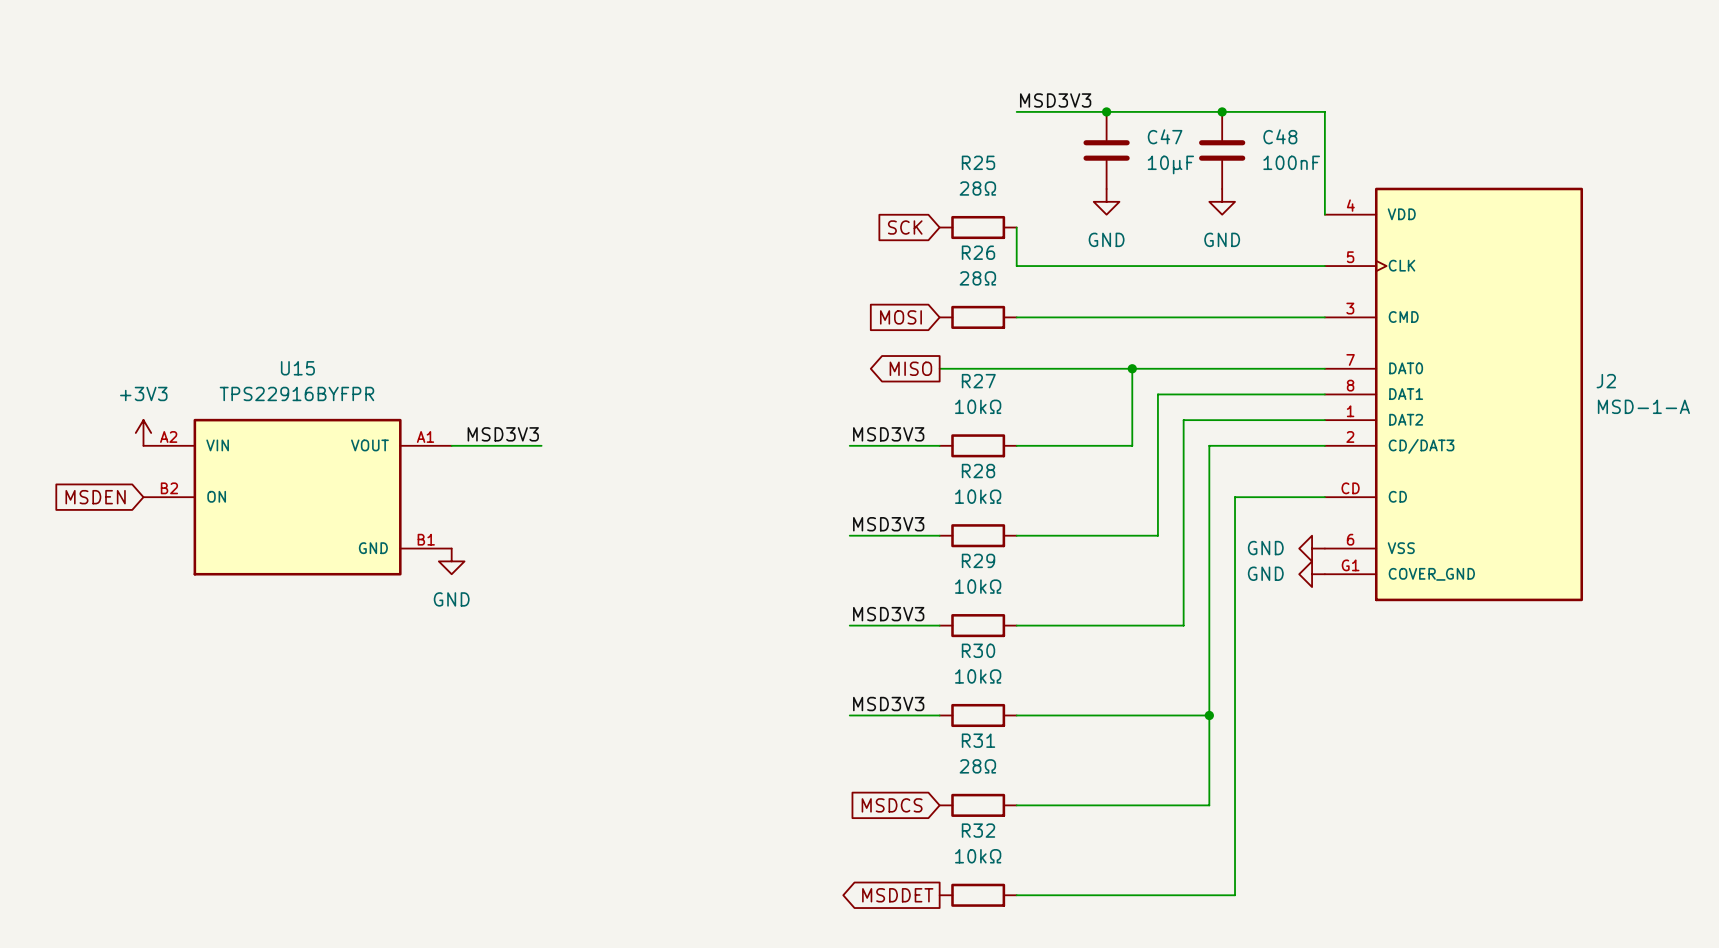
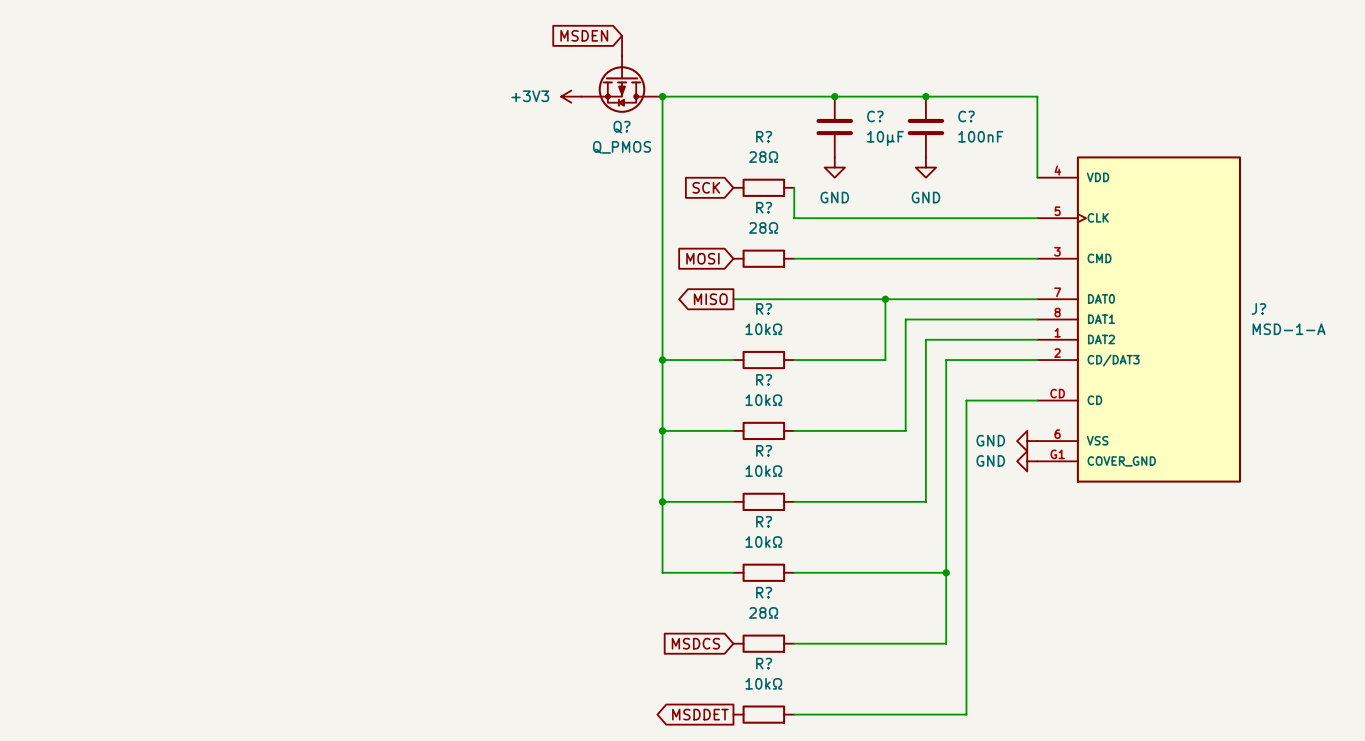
global label: none -> MSDEN (584, 35)
Q?: none -> Q_PMOS (622, 74)
label: MSD3V3 (1055, 100) -> none
power symbol: none -> +3V3 (571, 96)
junction: none -> (662, 96)
wire: none -> (794, 96) (662, 96) (662, 572)
junction: none -> (834, 96)
junction: (1106, 111) -> none
junction: none -> (925, 96)
junction: (1222, 111) -> none
C?: none -> 10µF (834, 127)
C47: 10µF (1106, 150) -> none
C?: none -> 100nF (925, 127)
C48: 100nF (1222, 150) -> none
R25 name: R25 (978, 162) -> R? (764, 136)
power symbol: none -> GND (834, 167)
power symbol: GND (1106, 201) -> none
power symbol: none -> GND (925, 167)
power symbol: GND (1222, 201) -> none
R26 name: R26 (978, 252) -> R? (764, 207)
R27 name: R27 (978, 381) -> R? (764, 308)
J2 name: J2 (1606, 381) -> J? (1258, 308)
power symbol: +3V3 (143, 432) -> none
label: MSD3V3 (503, 434) -> none
label: MSD3V3 (888, 434) -> none
wire: (451, 445) (541, 445) -> none
junction: none -> (662, 360)
R28 name: R28 (978, 471) -> R? (764, 379)
global label: MSDEN (95, 497) -> none
U15: TPS22916BYFPR (297, 497) -> none
label: MSD3V3 (888, 524) -> none
junction: none -> (662, 430)
R29 name: R29 (978, 560) -> R? (764, 450)
power symbol: GND (451, 561) -> none
label: MSD3V3 (888, 614) -> none
junction: none -> (662, 501)
R30 name: R30 (978, 650) -> R? (764, 521)
label: MSD3V3 (888, 704) -> none
R31 name: R31 (978, 740) -> R? (764, 592)
R32 name: R32 (978, 830) -> R? (764, 663)

